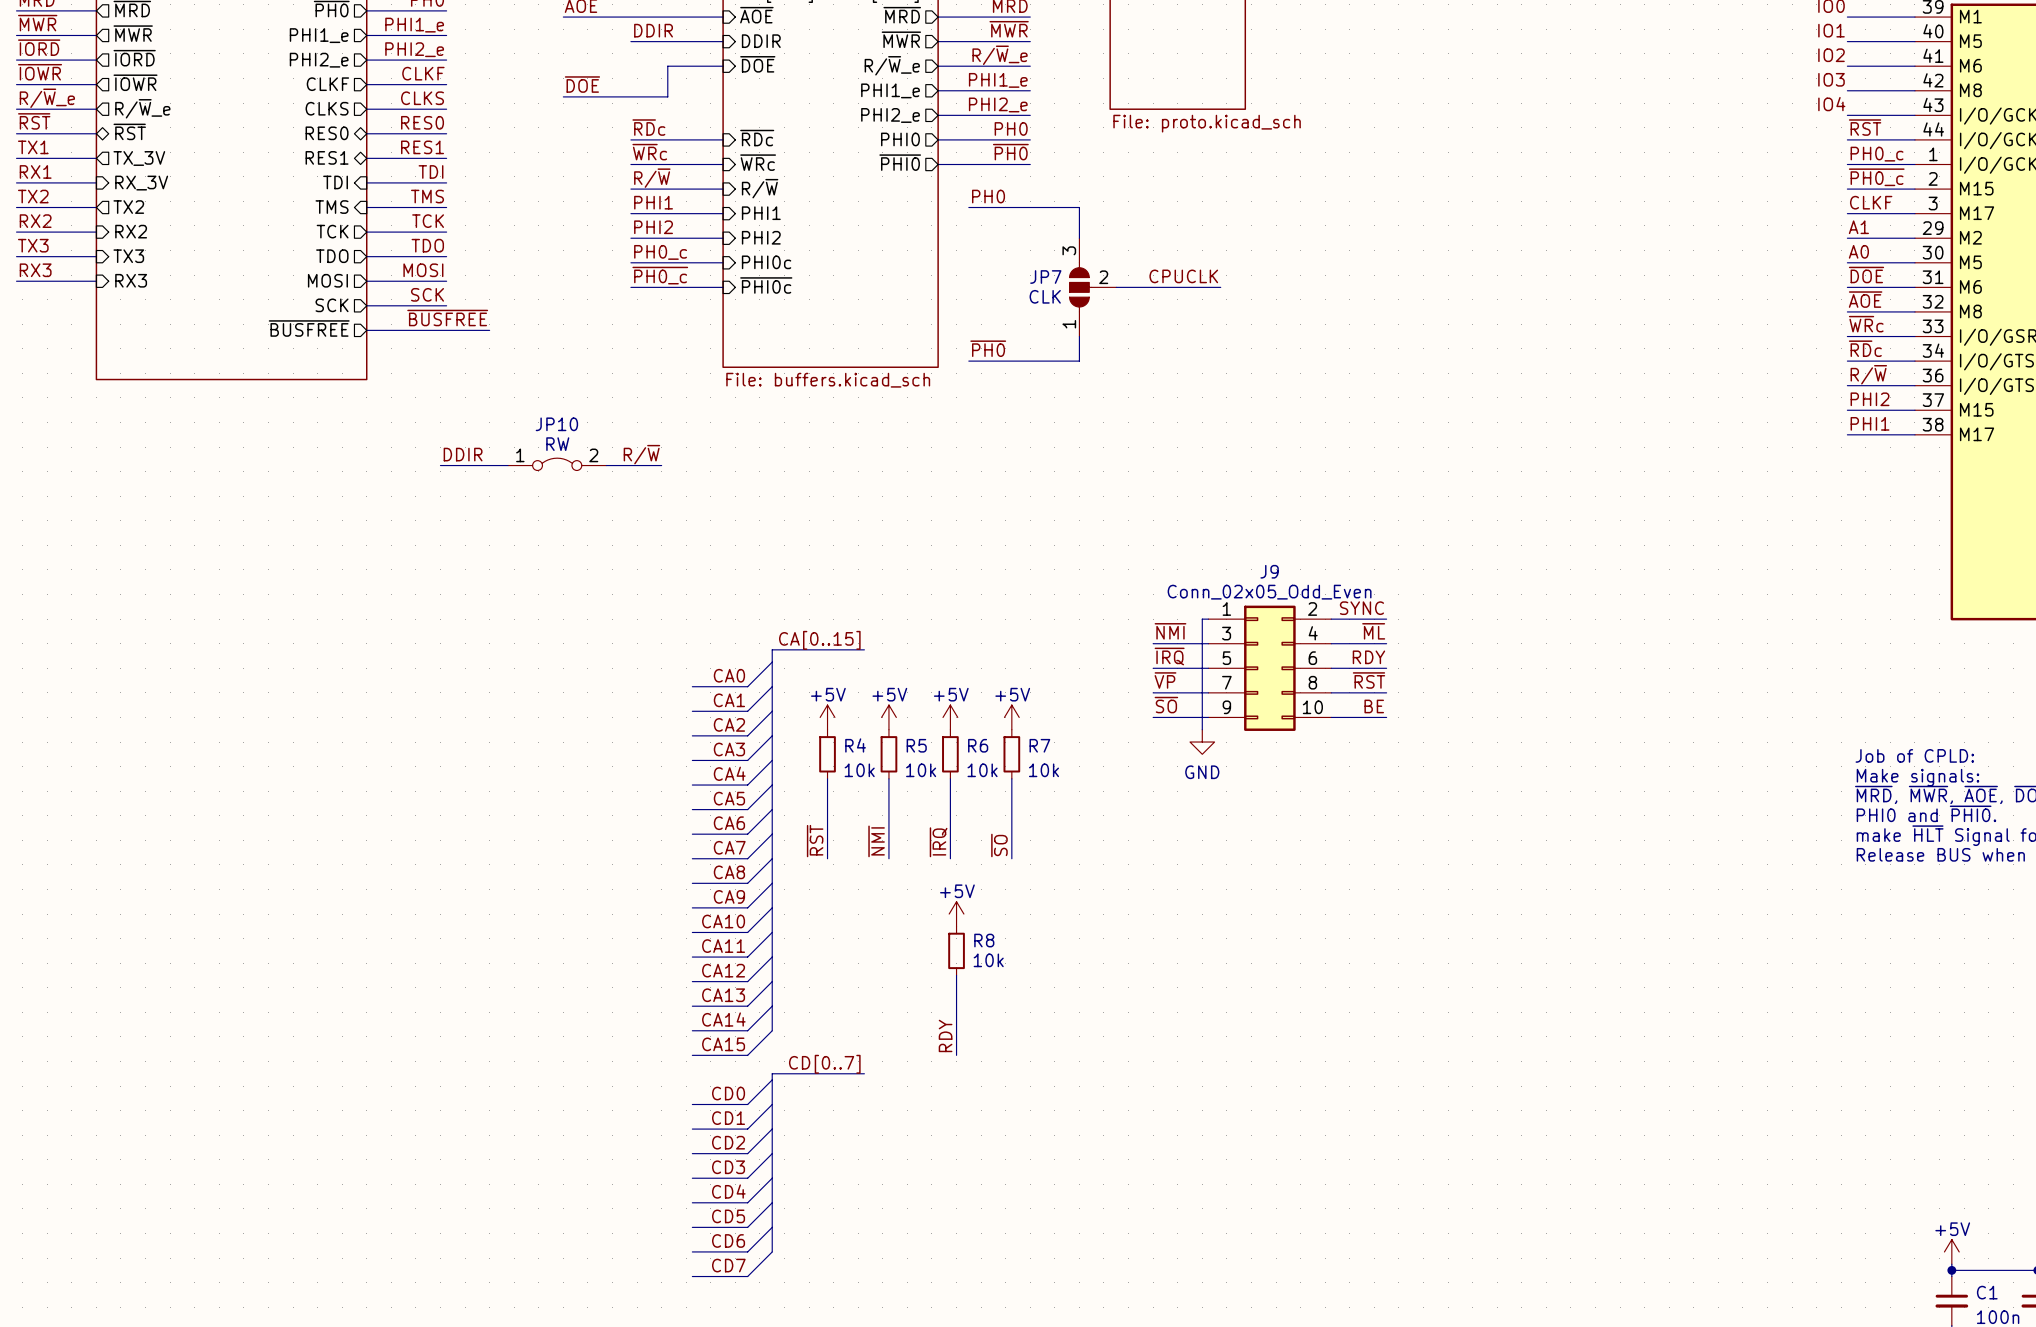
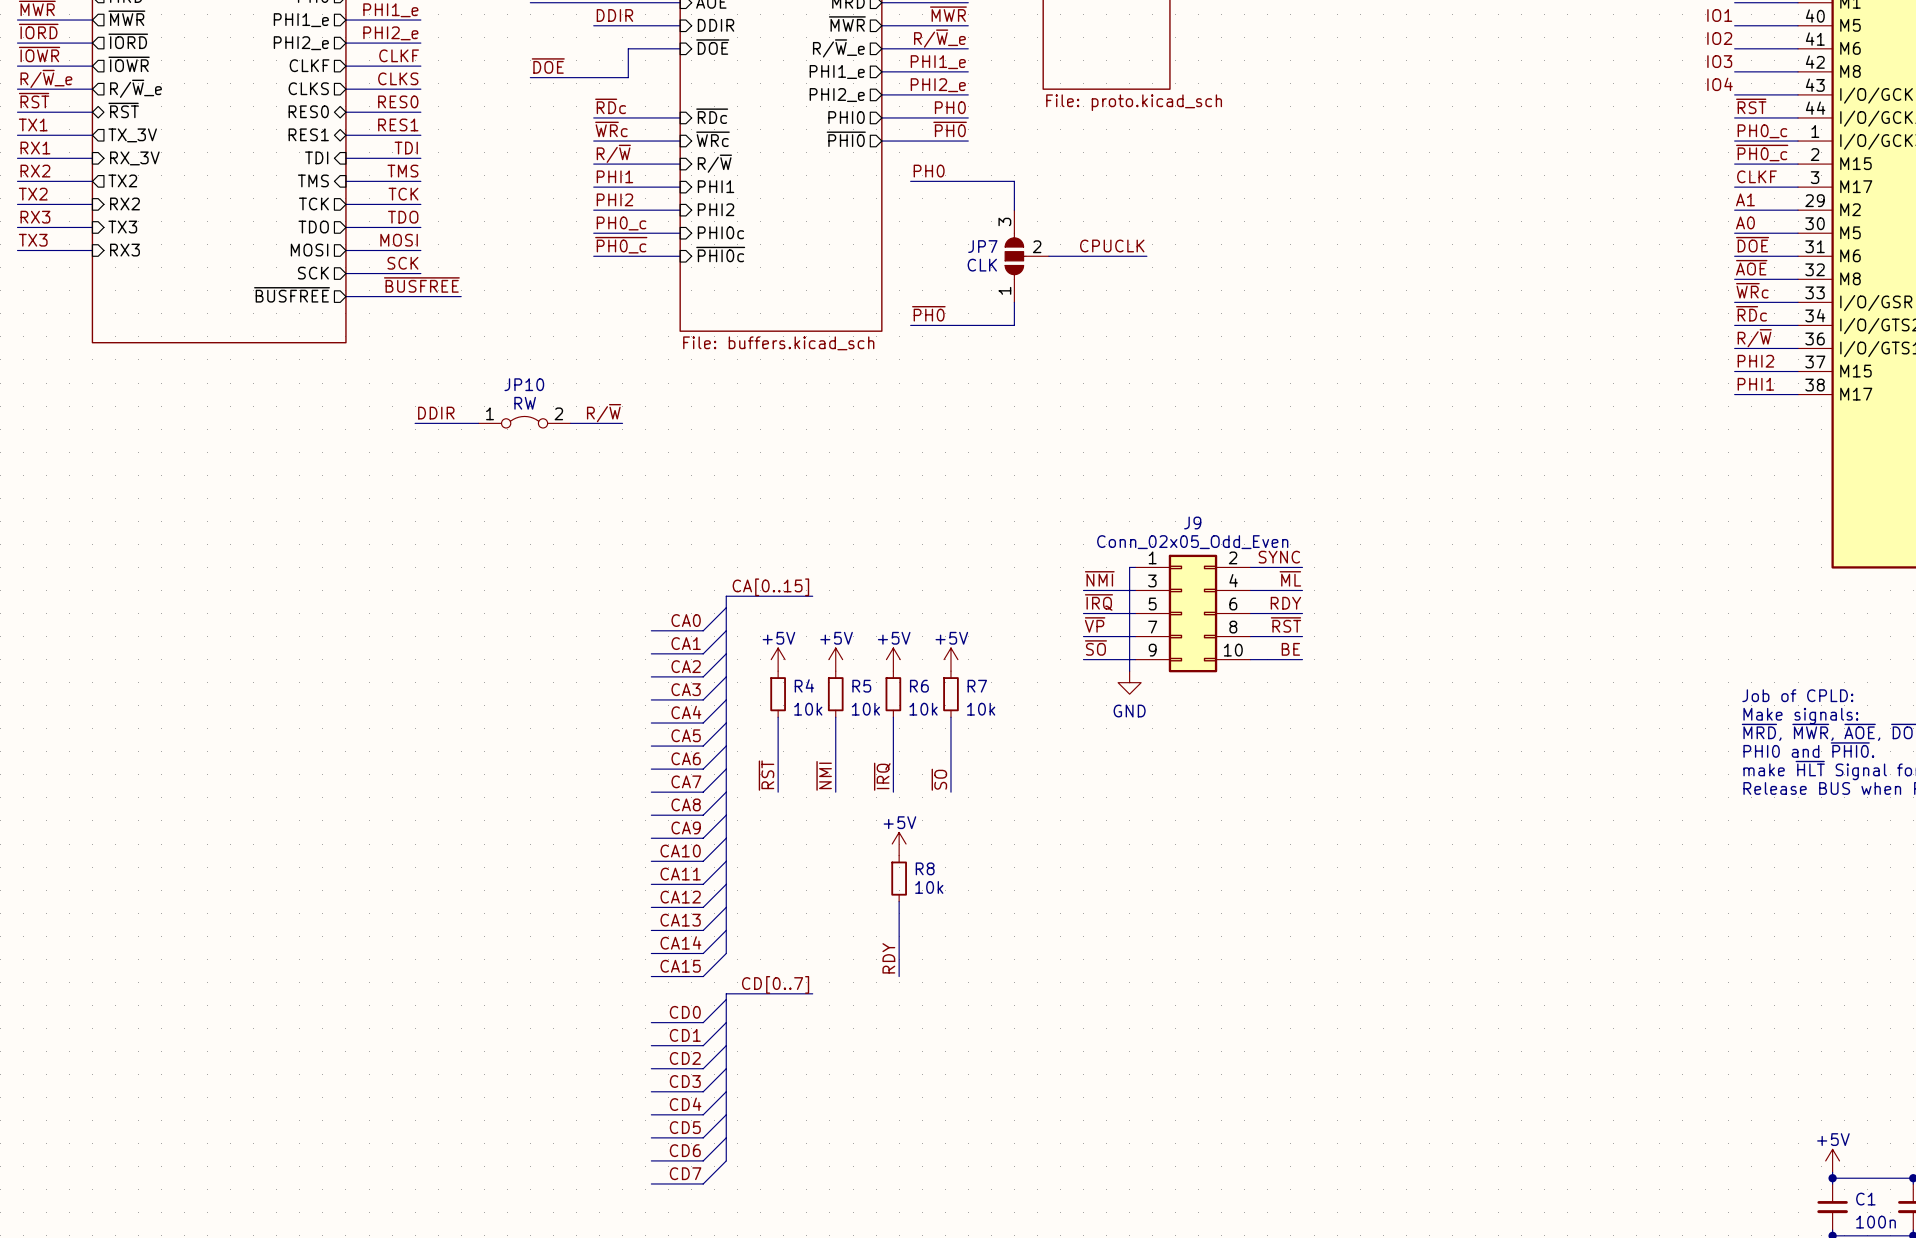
label: TX2 (33, 196) -> RX2 (35, 171)
label: RX2 (35, 221) -> TX2 (33, 194)
label: TX3 (33, 245) -> RX3 (35, 217)
label: RX3 (35, 270) -> TX3 (33, 240)

